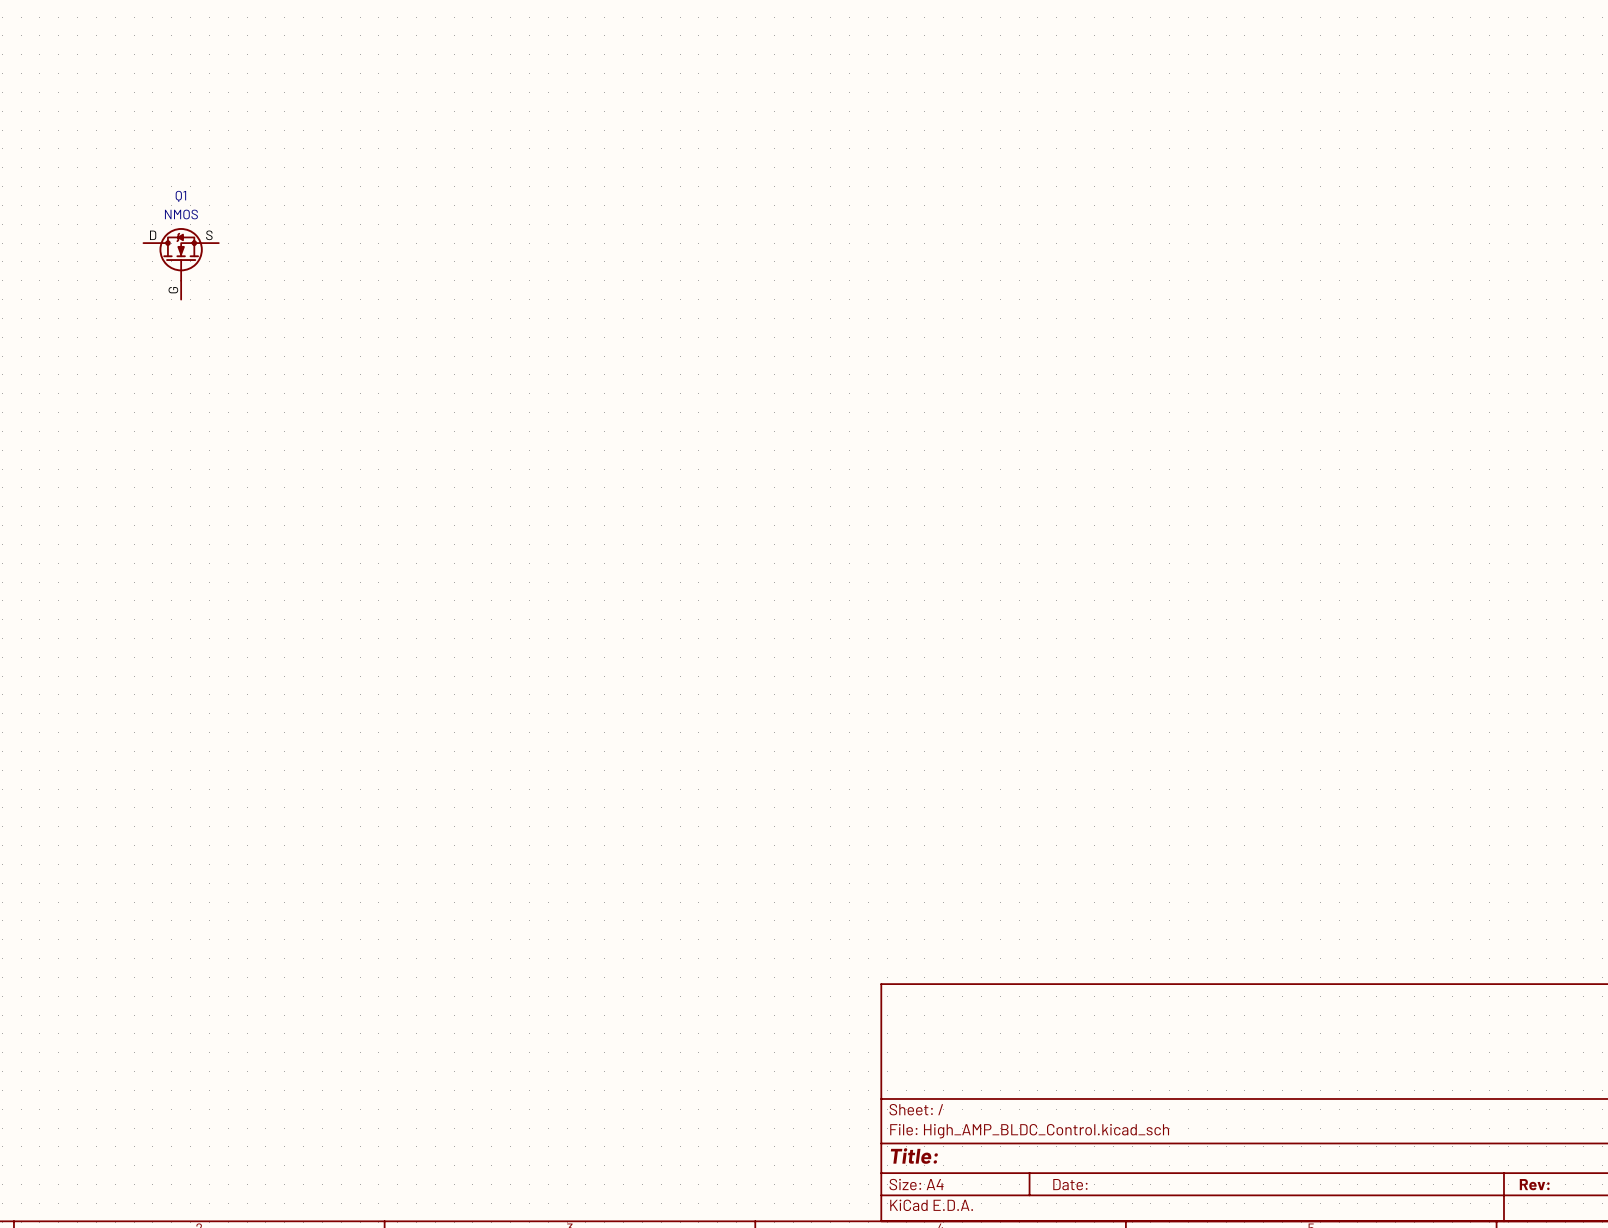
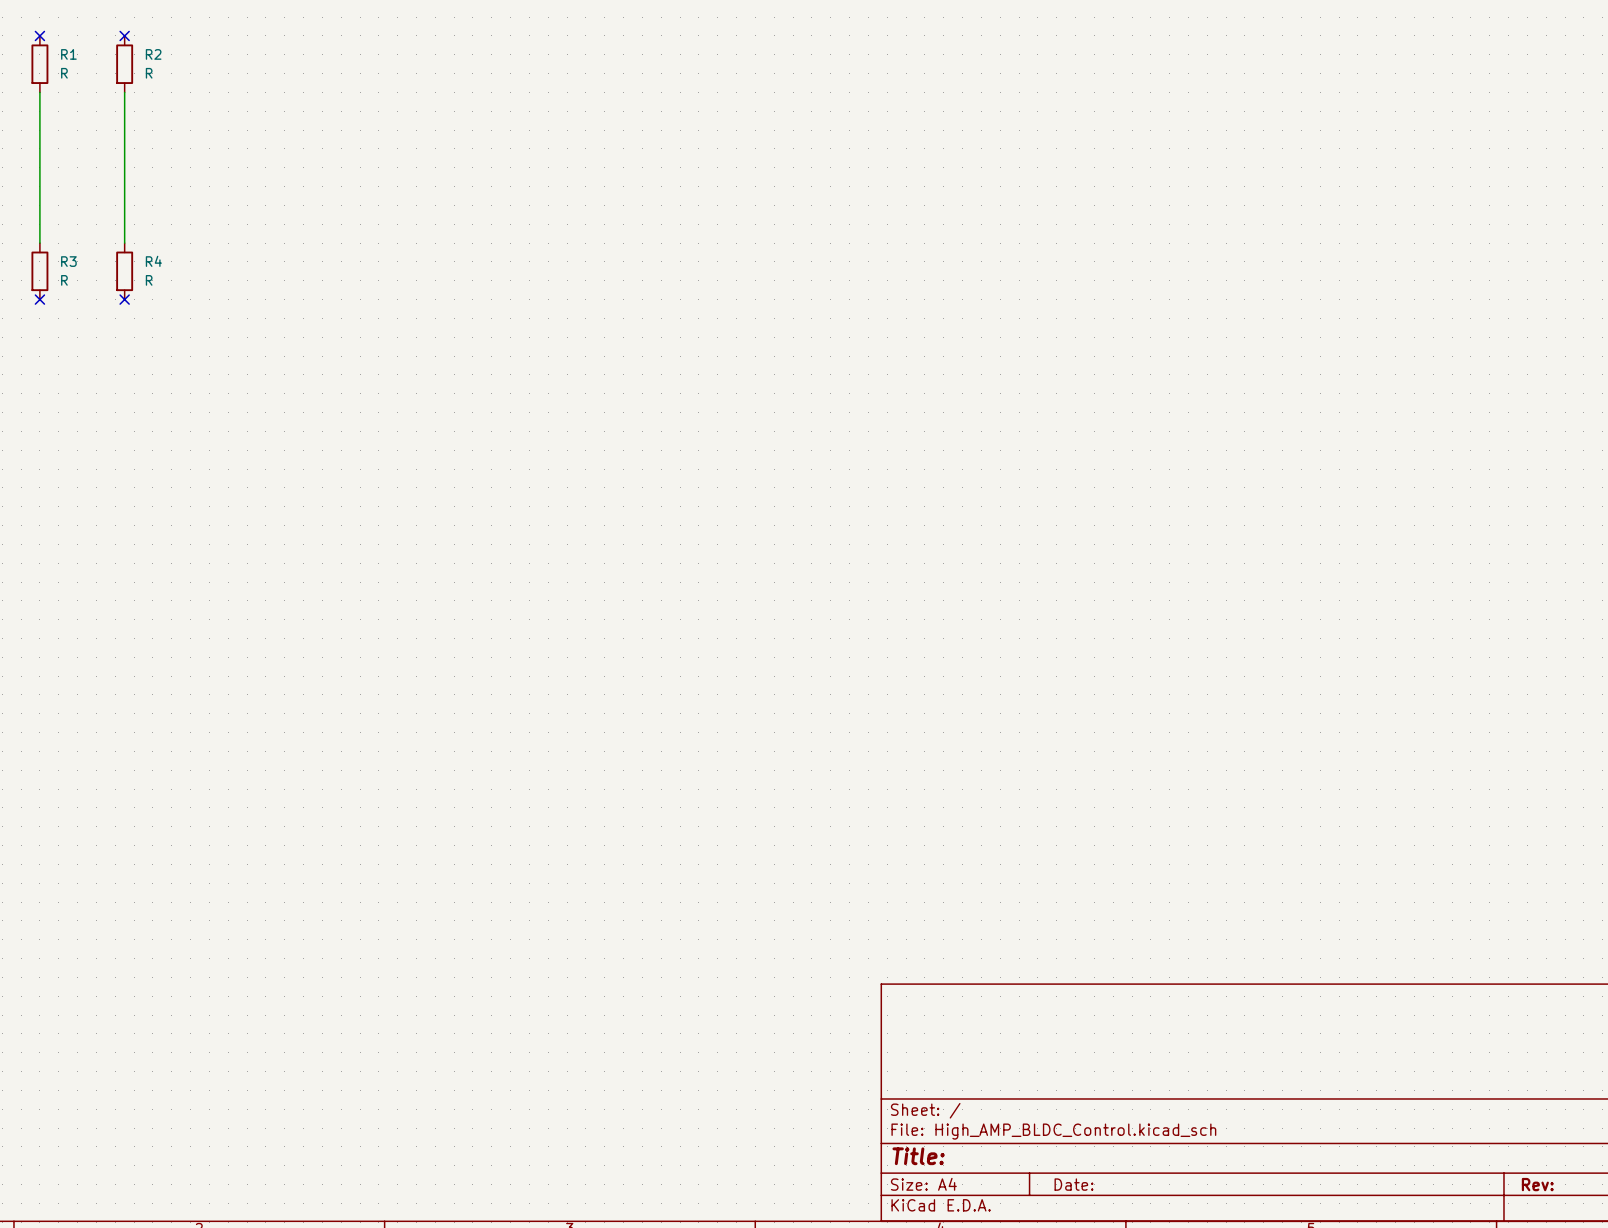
no-connect mark: none -> (39, 35)
no-connect mark: none -> (124, 35)
R1: none -> R (39, 64)
R2: none -> R (124, 64)
wire: none -> (39, 92) (39, 243)
wire: none -> (124, 92) (124, 243)
Q1: NMOS (181, 263) -> none
R3: none -> R (39, 271)
R4: none -> R (124, 271)
no-connect mark: none -> (39, 299)
no-connect mark: none -> (124, 299)

